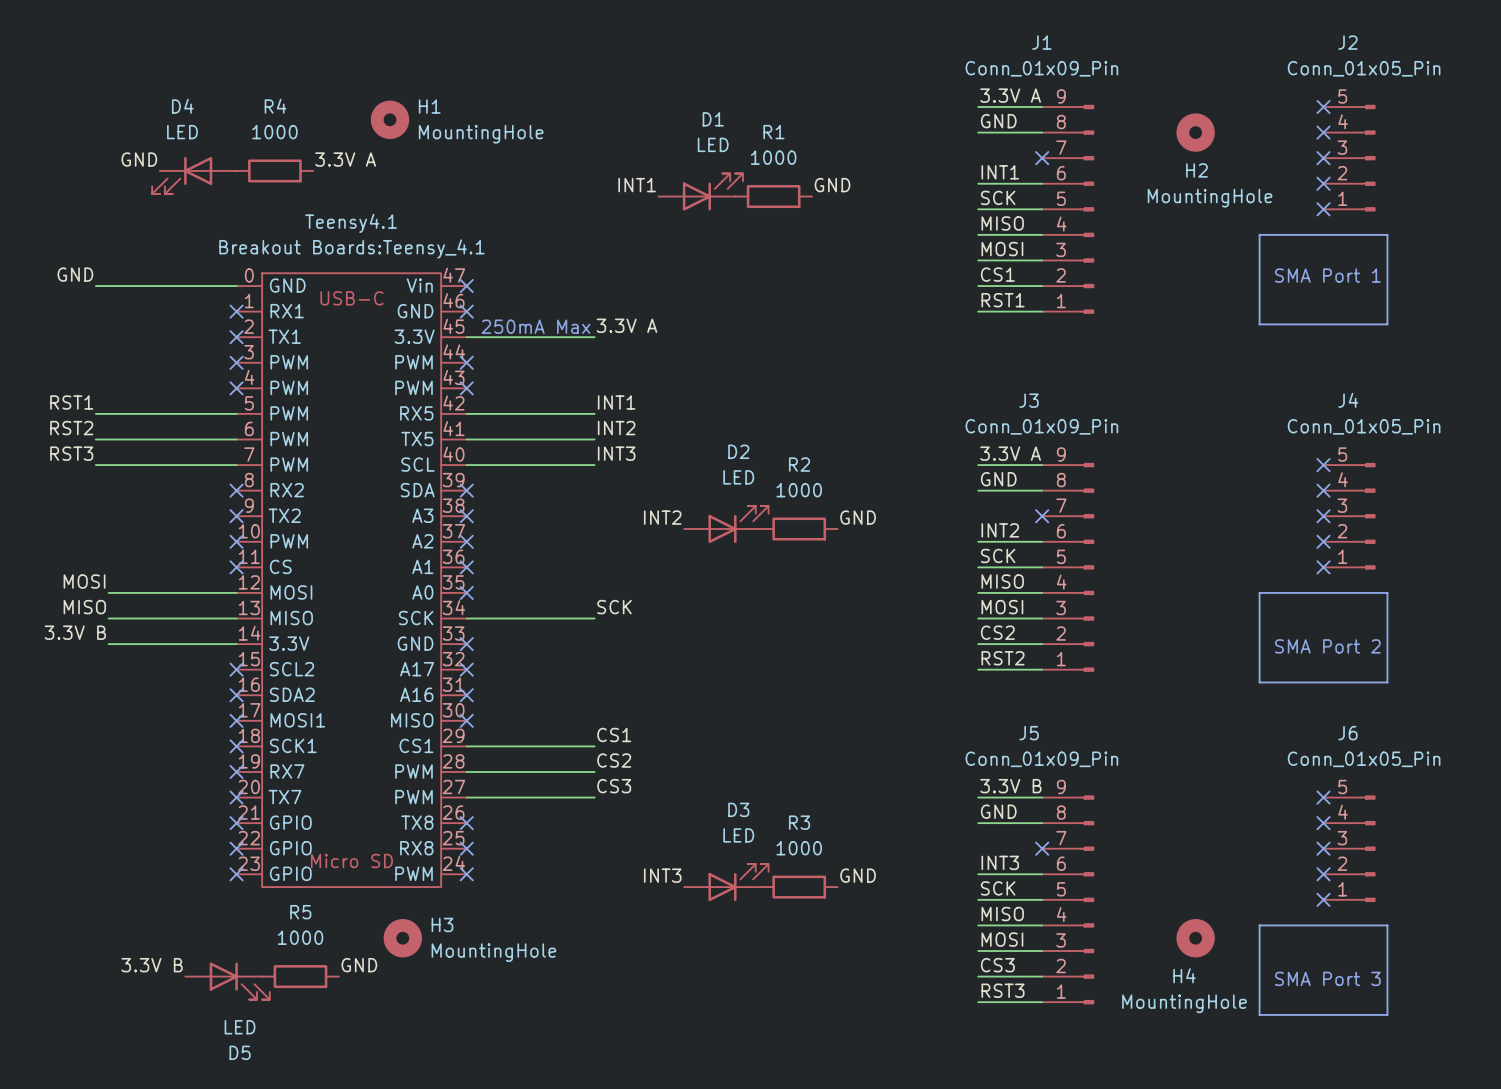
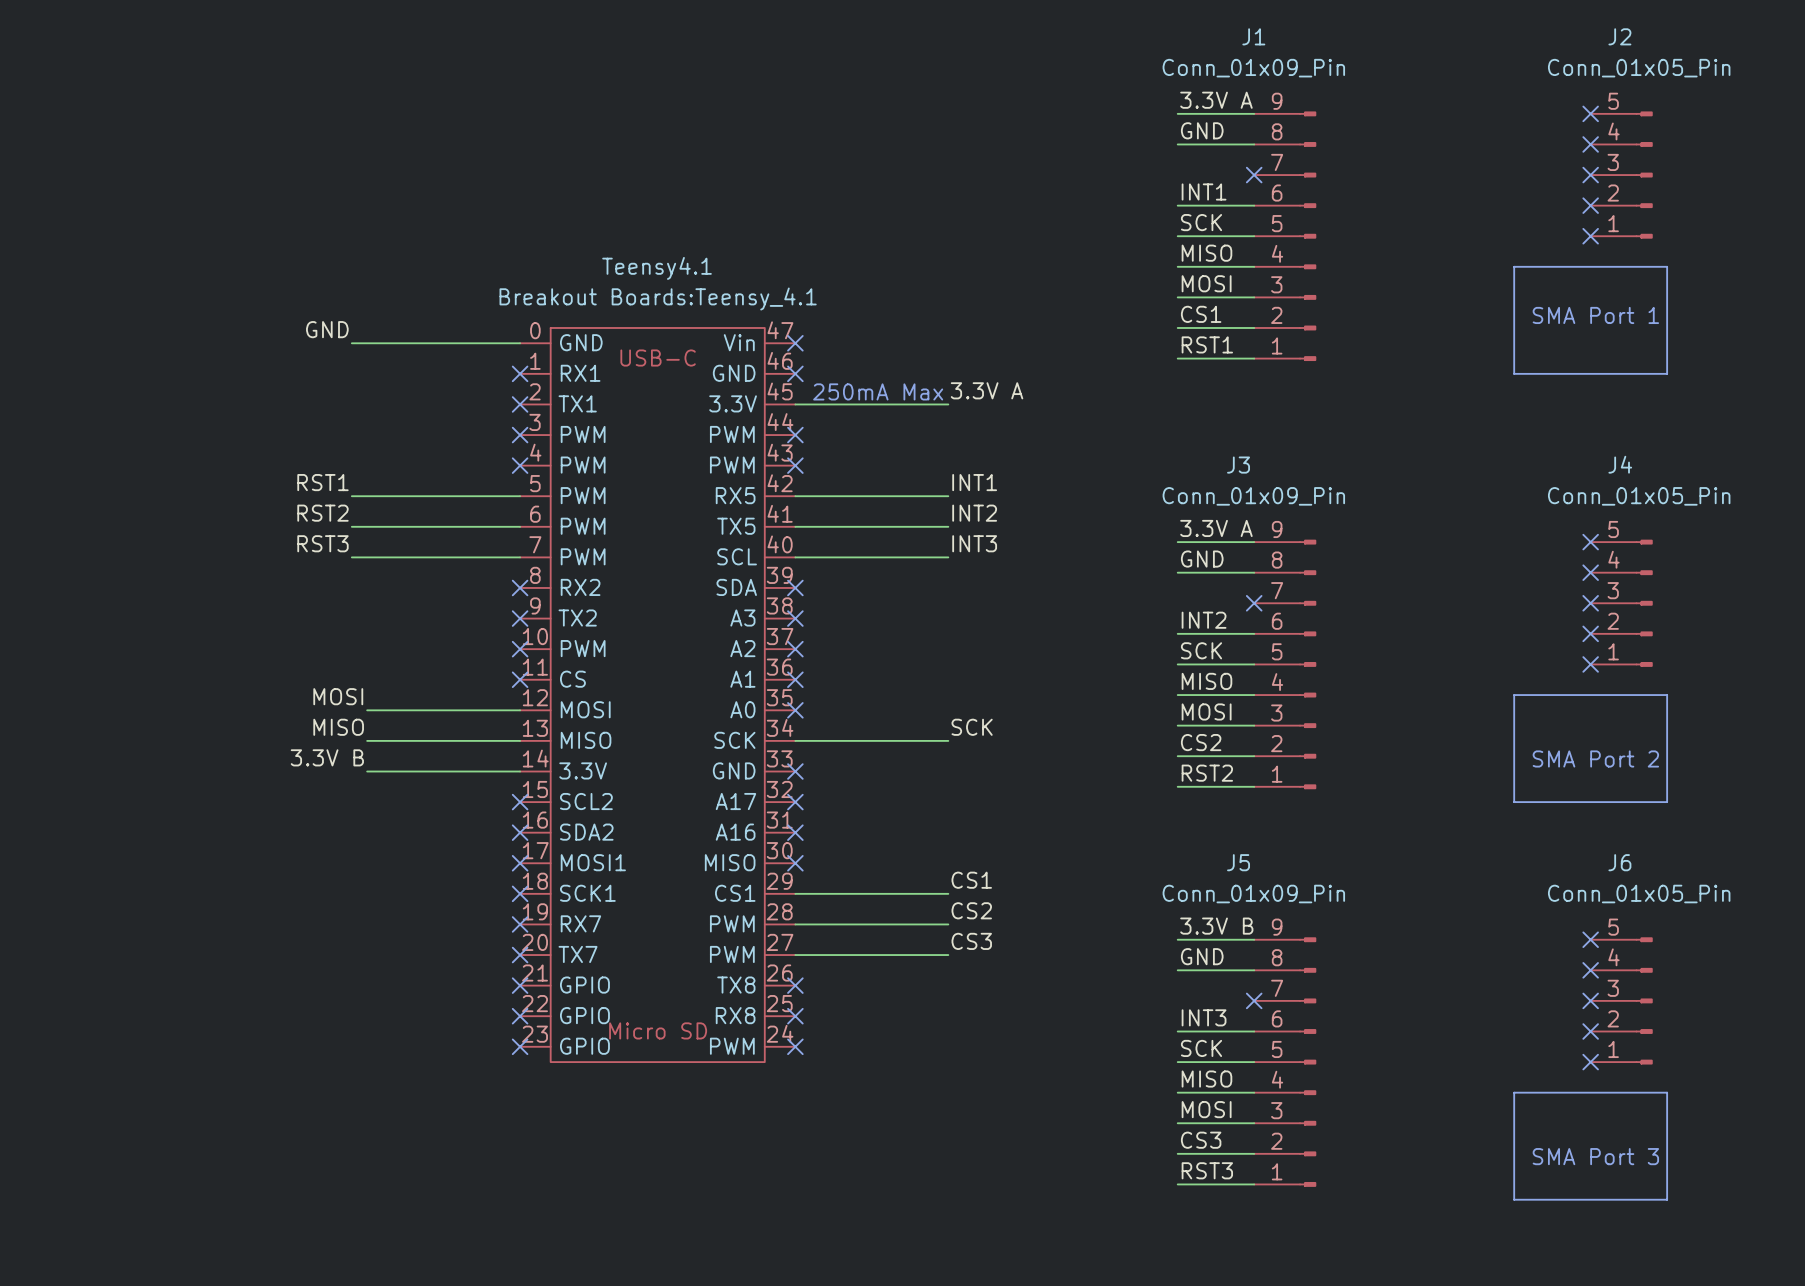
H1: MountingHole (390, 119) -> none
H2: MountingHole (1195, 132) -> none
label: GND (139, 159) -> none
label: 3.3V A (345, 159) -> none
R4: 1000 (274, 170) -> none
D4: LED (194, 175) -> none
label: INT1 (637, 185) -> none
label: GND (832, 185) -> none
D1: LED (700, 192) -> none
R1: 1000 (773, 196) -> none
label: GND (75, 274) -> none
wire: (95, 286) (236, 286) -> (351, 343) (520, 343)
no-connect mark: (466, 286) -> none
label: none -> GND (327, 329)
no-connect mark: none -> (795, 343)
no-connect mark: (236, 311) -> none
no-connect mark: (466, 311) -> none
no-connect mark: none -> (520, 373)
no-connect mark: none -> (795, 373)
label position: 3.3V A (626, 325) -> 3.3V A (987, 390)
text position: 250mA Max (535, 326) -> 250mA Max (878, 391)
no-connect mark: (236, 337) -> none
wire: (466, 337) (594, 337) -> (795, 404) (948, 404)
no-connect mark: none -> (520, 404)
no-connect mark: (236, 362) -> none
no-connect mark: (466, 362) -> none
no-connect mark: none -> (520, 435)
no-connect mark: none -> (795, 435)
no-connect mark: (236, 388) -> none
no-connect mark: (466, 388) -> none
no-connect mark: none -> (520, 465)
no-connect mark: none -> (795, 465)
label position: RST1 (71, 402) -> RST1 (322, 482)
label: INT1 (616, 402) -> none
wire: (95, 413) (236, 413) -> (351, 496) (520, 496)
wire: (466, 413) (594, 413) -> (795, 496) (948, 496)
label: none -> INT1 (974, 482)
label position: RST2 (71, 428) -> RST2 (322, 513)
label: INT2 (616, 428) -> none
wire: (95, 439) (236, 439) -> (351, 526) (520, 526)
wire: (466, 439) (594, 439) -> (795, 526) (948, 526)
label: none -> INT2 (974, 513)
label position: RST3 (71, 453) -> RST3 (322, 543)
label position: INT3 (616, 453) -> INT3 (974, 543)
wire: (95, 465) (236, 465) -> (351, 557) (520, 557)
wire: (466, 465) (594, 465) -> (795, 557) (948, 557)
no-connect mark: (236, 490) -> none
no-connect mark: (466, 490) -> none
no-connect mark: none -> (520, 587)
no-connect mark: none -> (795, 587)
no-connect mark: (236, 516) -> none
no-connect mark: (466, 516) -> none
label: INT2 (662, 517) -> none
label: GND (858, 517) -> none
D2: LED (726, 524) -> none
no-connect mark: none -> (520, 618)
no-connect mark: none -> (795, 618)
R2: 1000 (799, 529) -> none
no-connect mark: (236, 541) -> none
no-connect mark: (466, 541) -> none
no-connect mark: none -> (520, 649)
no-connect mark: none -> (795, 649)
no-connect mark: (236, 567) -> none
no-connect mark: (466, 567) -> none
Teensy4.1 position: (351, 580) -> (657, 695)
no-connect mark: none -> (520, 679)
no-connect mark: none -> (795, 679)
label position: MOSI (84, 581) -> MOSI (338, 696)
wire: (108, 592) (236, 592) -> (367, 710) (520, 710)
no-connect mark: (466, 592) -> none
no-connect mark: none -> (795, 710)
label position: MISO (84, 607) -> MISO (338, 727)
label position: SCK (614, 607) -> SCK (972, 727)
wire: (108, 618) (236, 618) -> (367, 740) (520, 740)
wire: (466, 618) (594, 618) -> (795, 740) (948, 740)
label: 3.3V B (75, 632) -> none
wire: (108, 644) (236, 644) -> (367, 771) (520, 771)
no-connect mark: (466, 644) -> none
label: none -> 3.3V B (327, 757)
no-connect mark: none -> (795, 771)
no-connect mark: (236, 669) -> none
no-connect mark: (466, 669) -> none
no-connect mark: none -> (520, 802)
no-connect mark: none -> (795, 802)
no-connect mark: (236, 695) -> none
no-connect mark: (466, 695) -> none
no-connect mark: none -> (520, 832)
no-connect mark: none -> (795, 832)
no-connect mark: (236, 720) -> none
no-connect mark: (466, 720) -> none
no-connect mark: none -> (520, 863)
no-connect mark: none -> (795, 863)
label position: CS1 (614, 734) -> CS1 (971, 880)
no-connect mark: (236, 746) -> none
wire: (466, 746) (594, 746) -> (795, 893) (948, 893)
no-connect mark: none -> (520, 893)
label position: CS2 (614, 760) -> CS2 (971, 910)
no-connect mark: (236, 771) -> none
wire: (466, 771) (594, 771) -> (795, 924) (948, 924)
no-connect mark: none -> (520, 924)
label position: CS3 (614, 786) -> CS3 (971, 941)
no-connect mark: (236, 797) -> none
wire: (466, 797) (594, 797) -> (795, 955) (948, 955)
no-connect mark: none -> (520, 955)
no-connect mark: (236, 823) -> none
no-connect mark: (466, 823) -> none
no-connect mark: none -> (520, 985)
no-connect mark: none -> (795, 985)
no-connect mark: (236, 848) -> none
no-connect mark: (466, 848) -> none
no-connect mark: none -> (520, 1016)
no-connect mark: none -> (795, 1016)
no-connect mark: (236, 874) -> none
no-connect mark: (466, 874) -> none
label: INT3 (662, 875) -> none
label: GND (858, 875) -> none
D3: LED (726, 882) -> none
no-connect mark: none -> (520, 1046)
no-connect mark: none -> (795, 1046)
R3: 1000 (799, 887) -> none
H3: MountingHole (402, 938) -> none
H4: MountingHole (1195, 938) -> none
label: 3.3V B (152, 965) -> none
label: GND (359, 965) -> none
R5: 1000 (300, 976) -> none
D5: LED (227, 981) -> none

